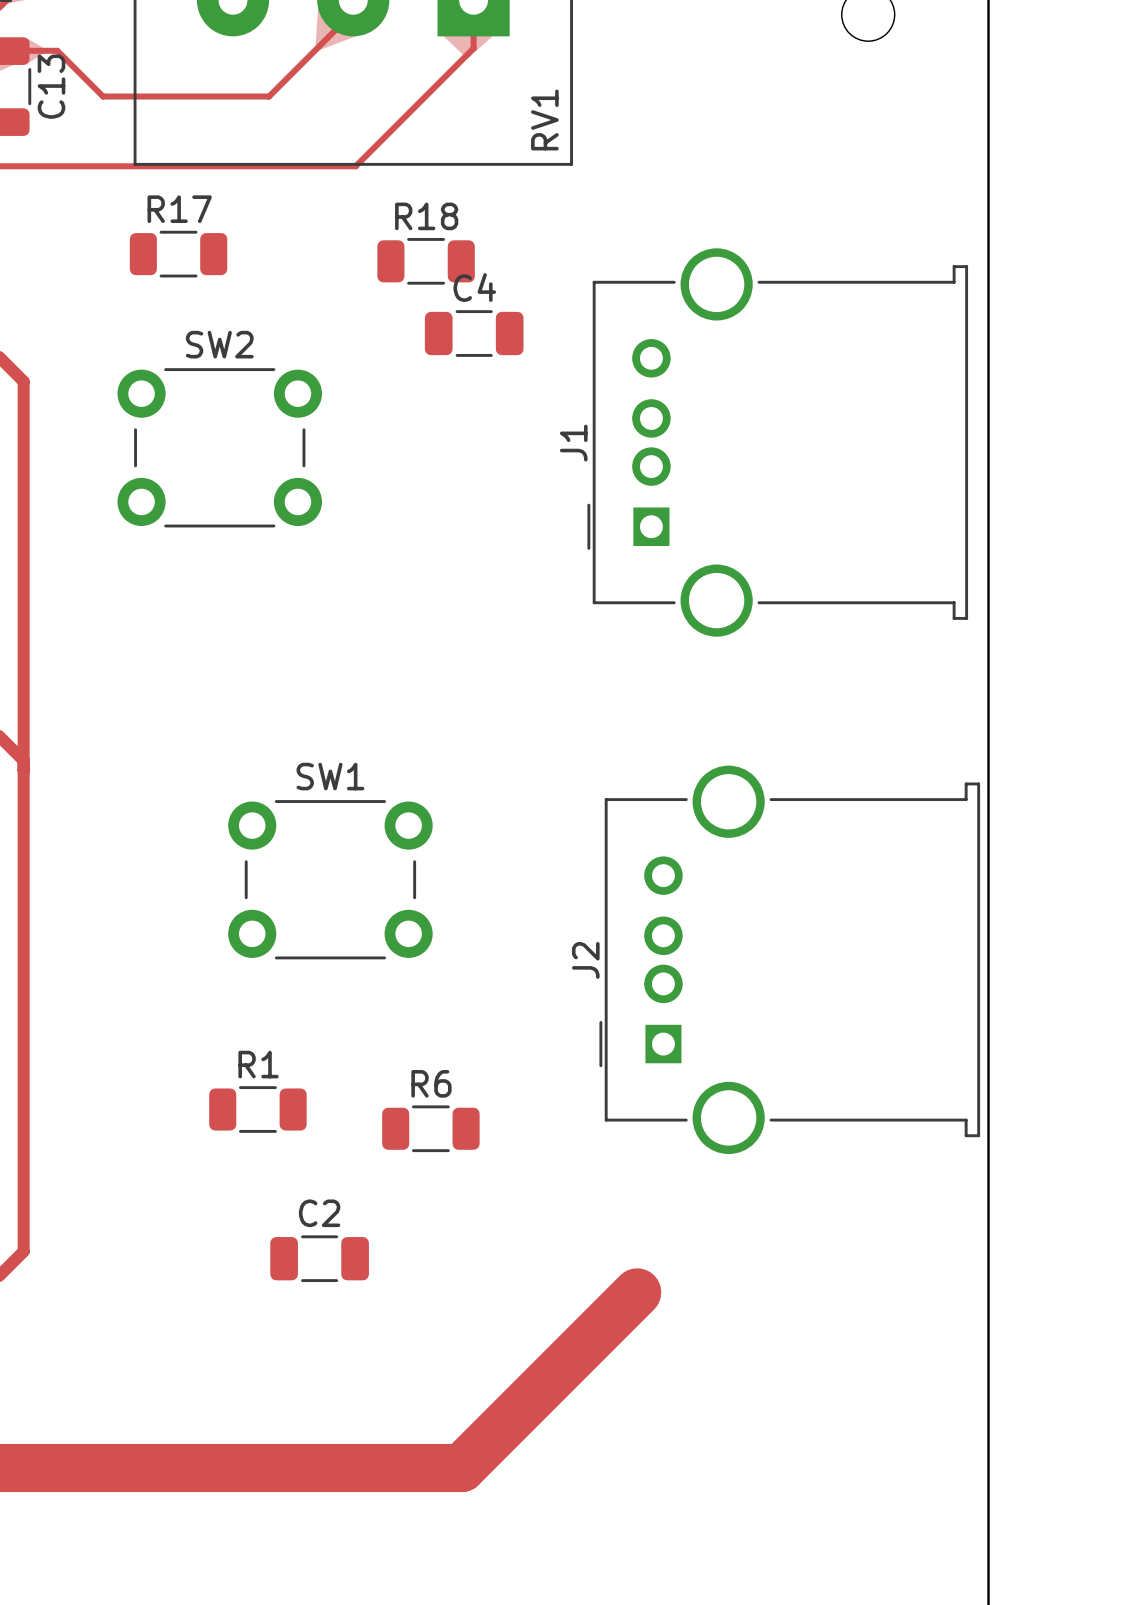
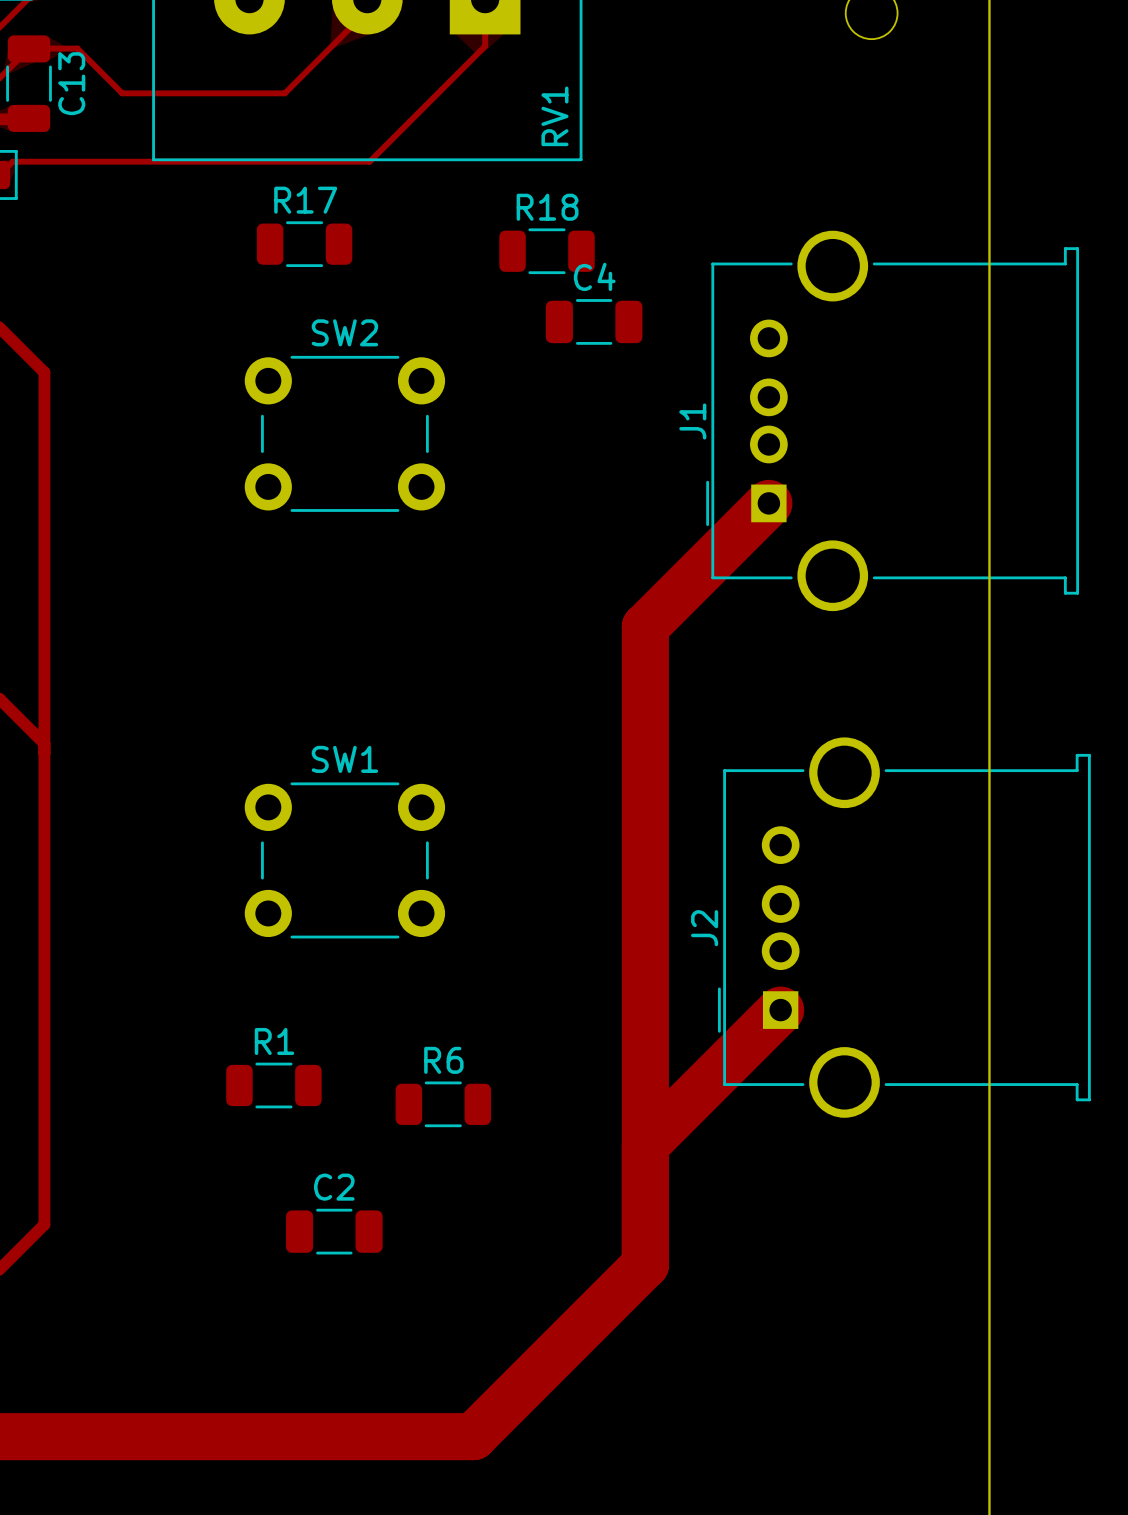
R17 position: (178, 254) -> (304, 244)
R18 position: (426, 261) -> (547, 251)
C4 position: (474, 333) -> (594, 321)
J1 position: (777, 442) -> (892, 420)
SW2 position: (219, 447) -> (344, 433)
track: none -> (768, 503) (645, 626) (645, 1264)
J2 position: (789, 959) -> (904, 927)
track: none -> (780, 1010) (645, 1145)

